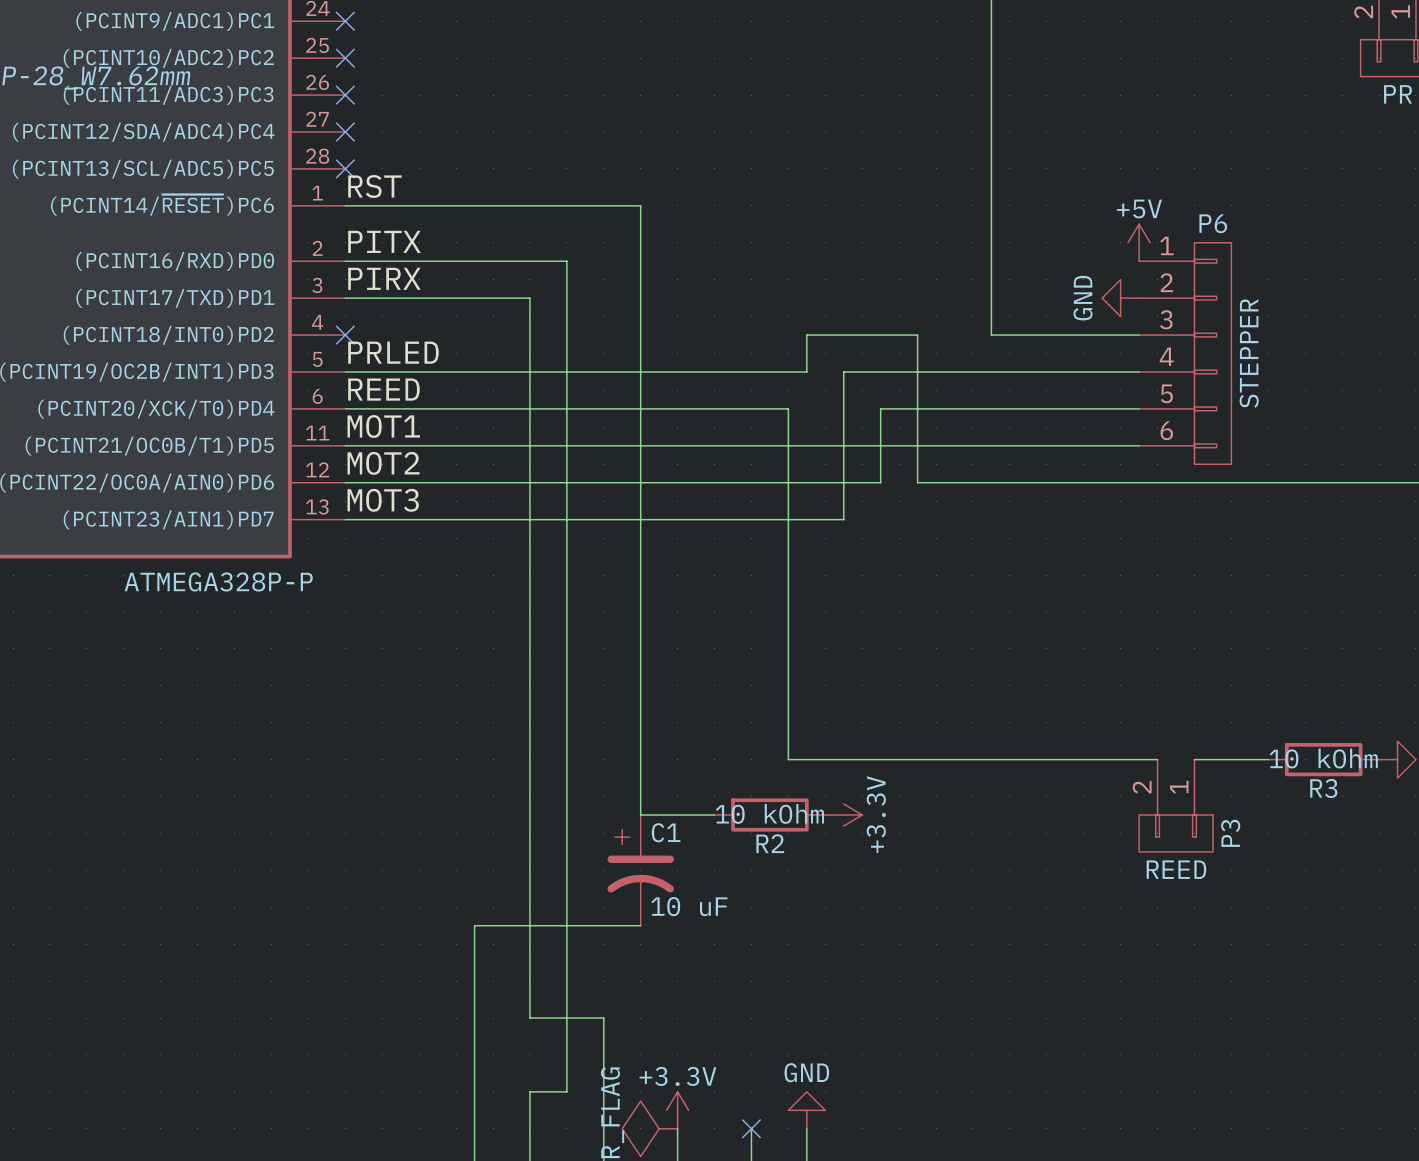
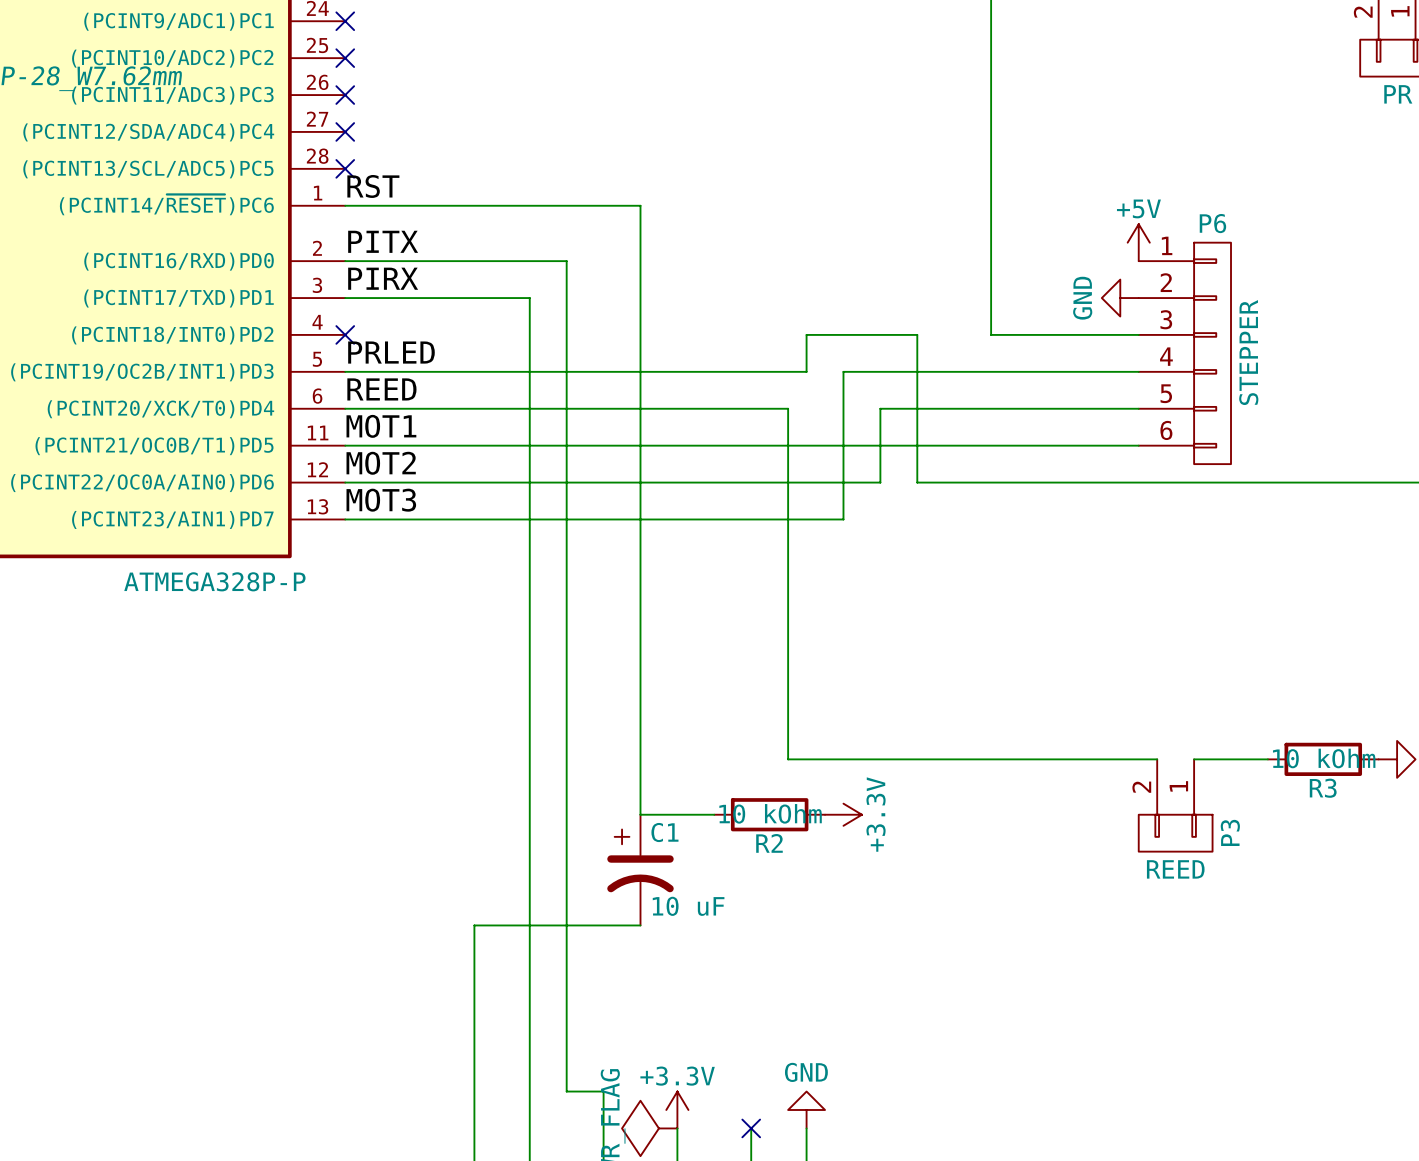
wire: (529, 1018) (603, 1018) (603, 1091) -> (529, 1017) (529, 1091)
wire: (529, 1091) (566, 1091) -> (603, 1091) (566, 1091)

